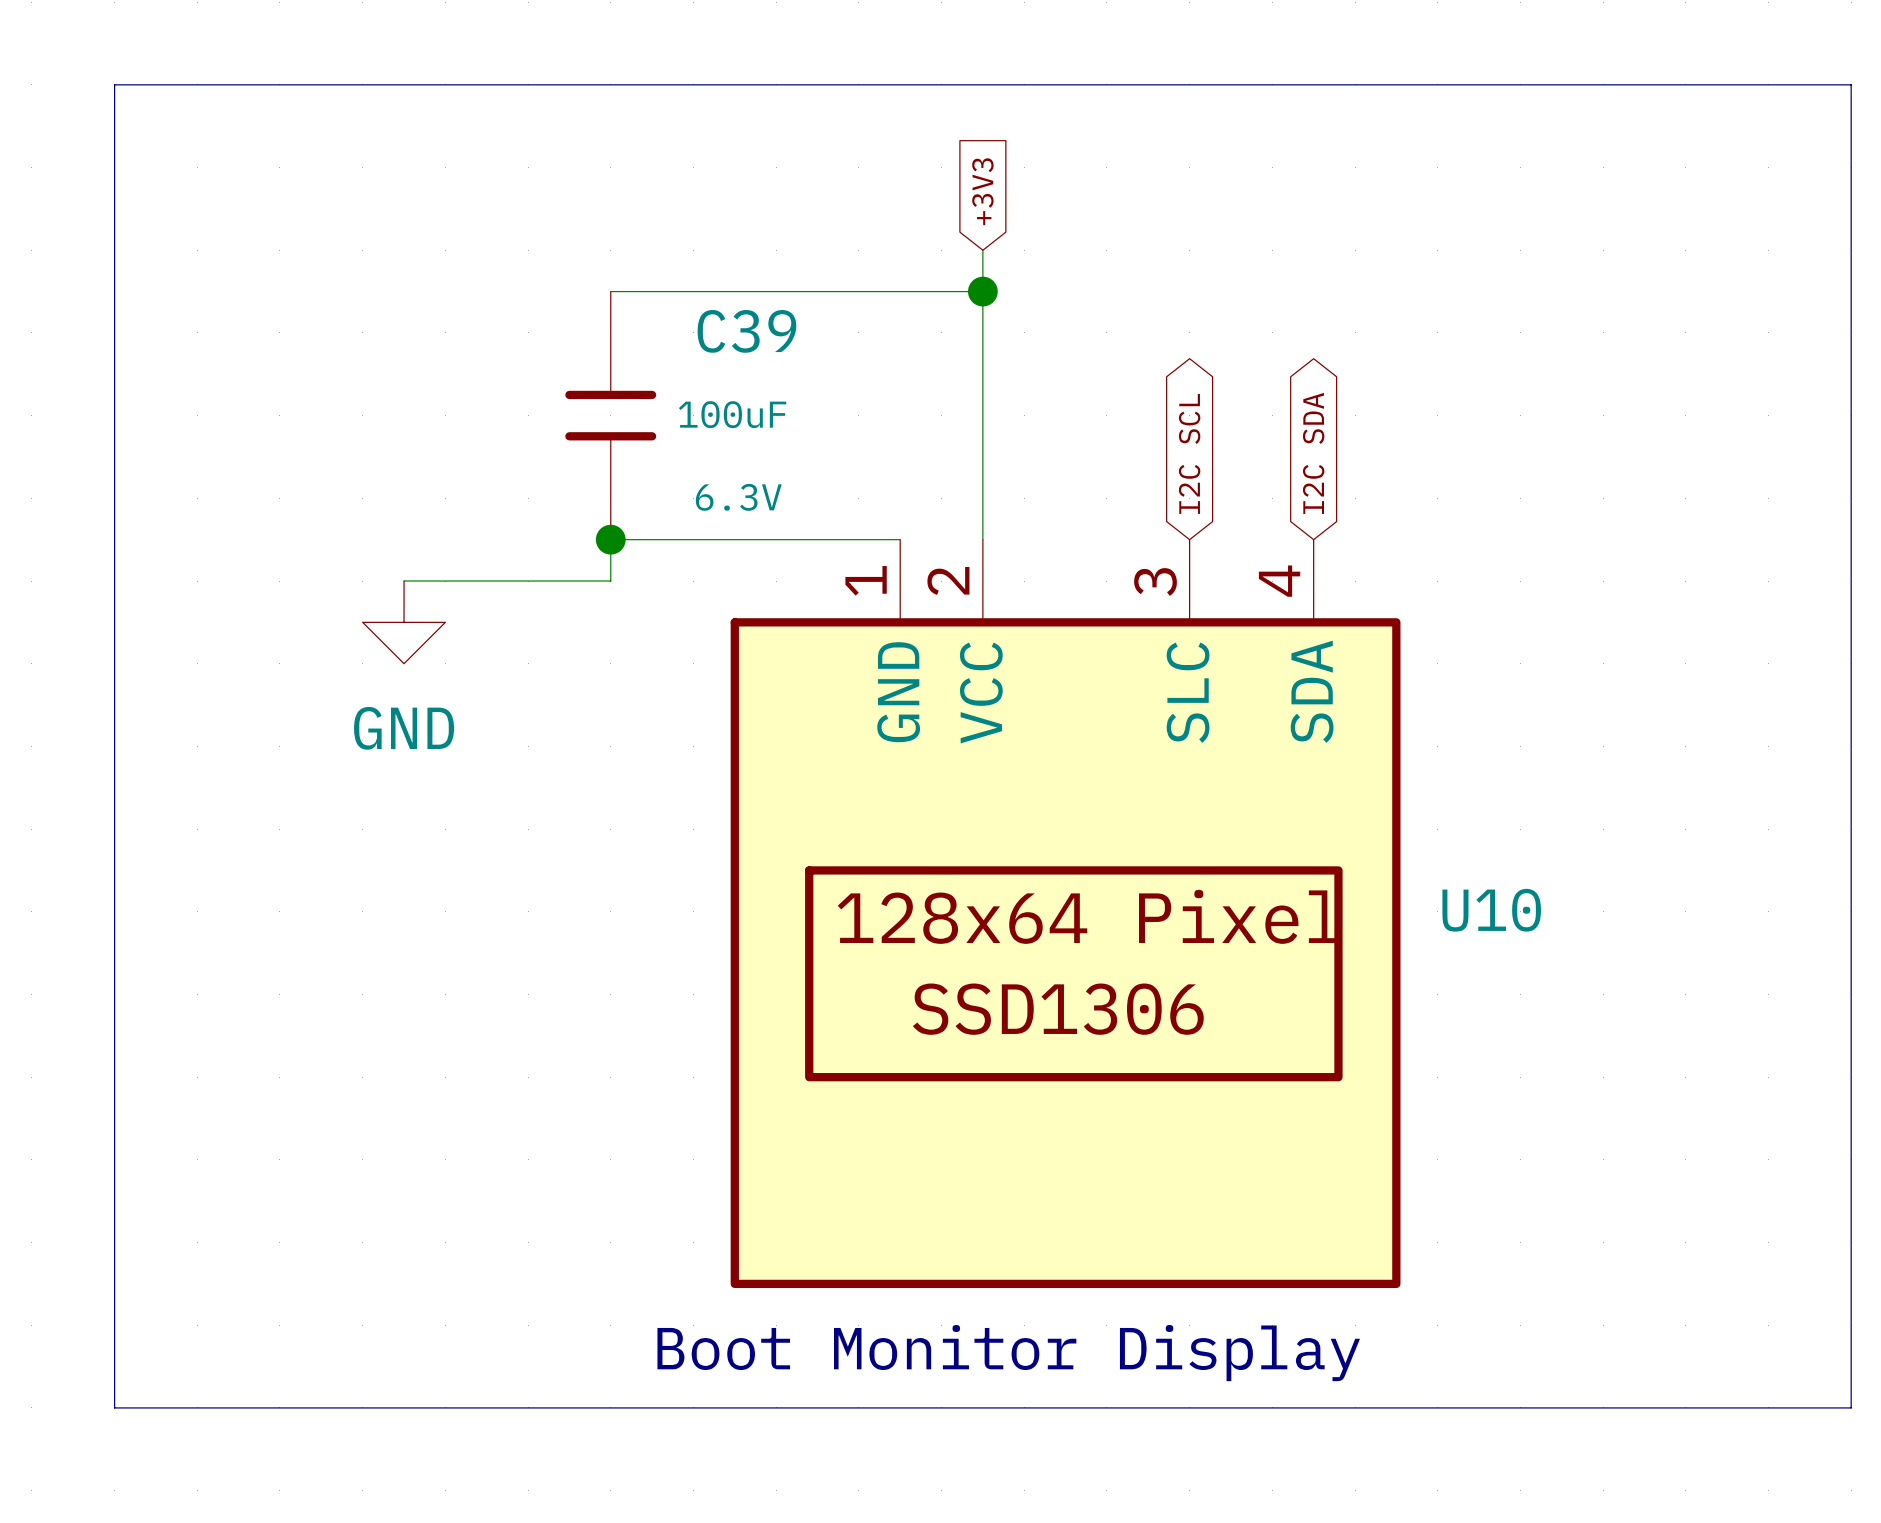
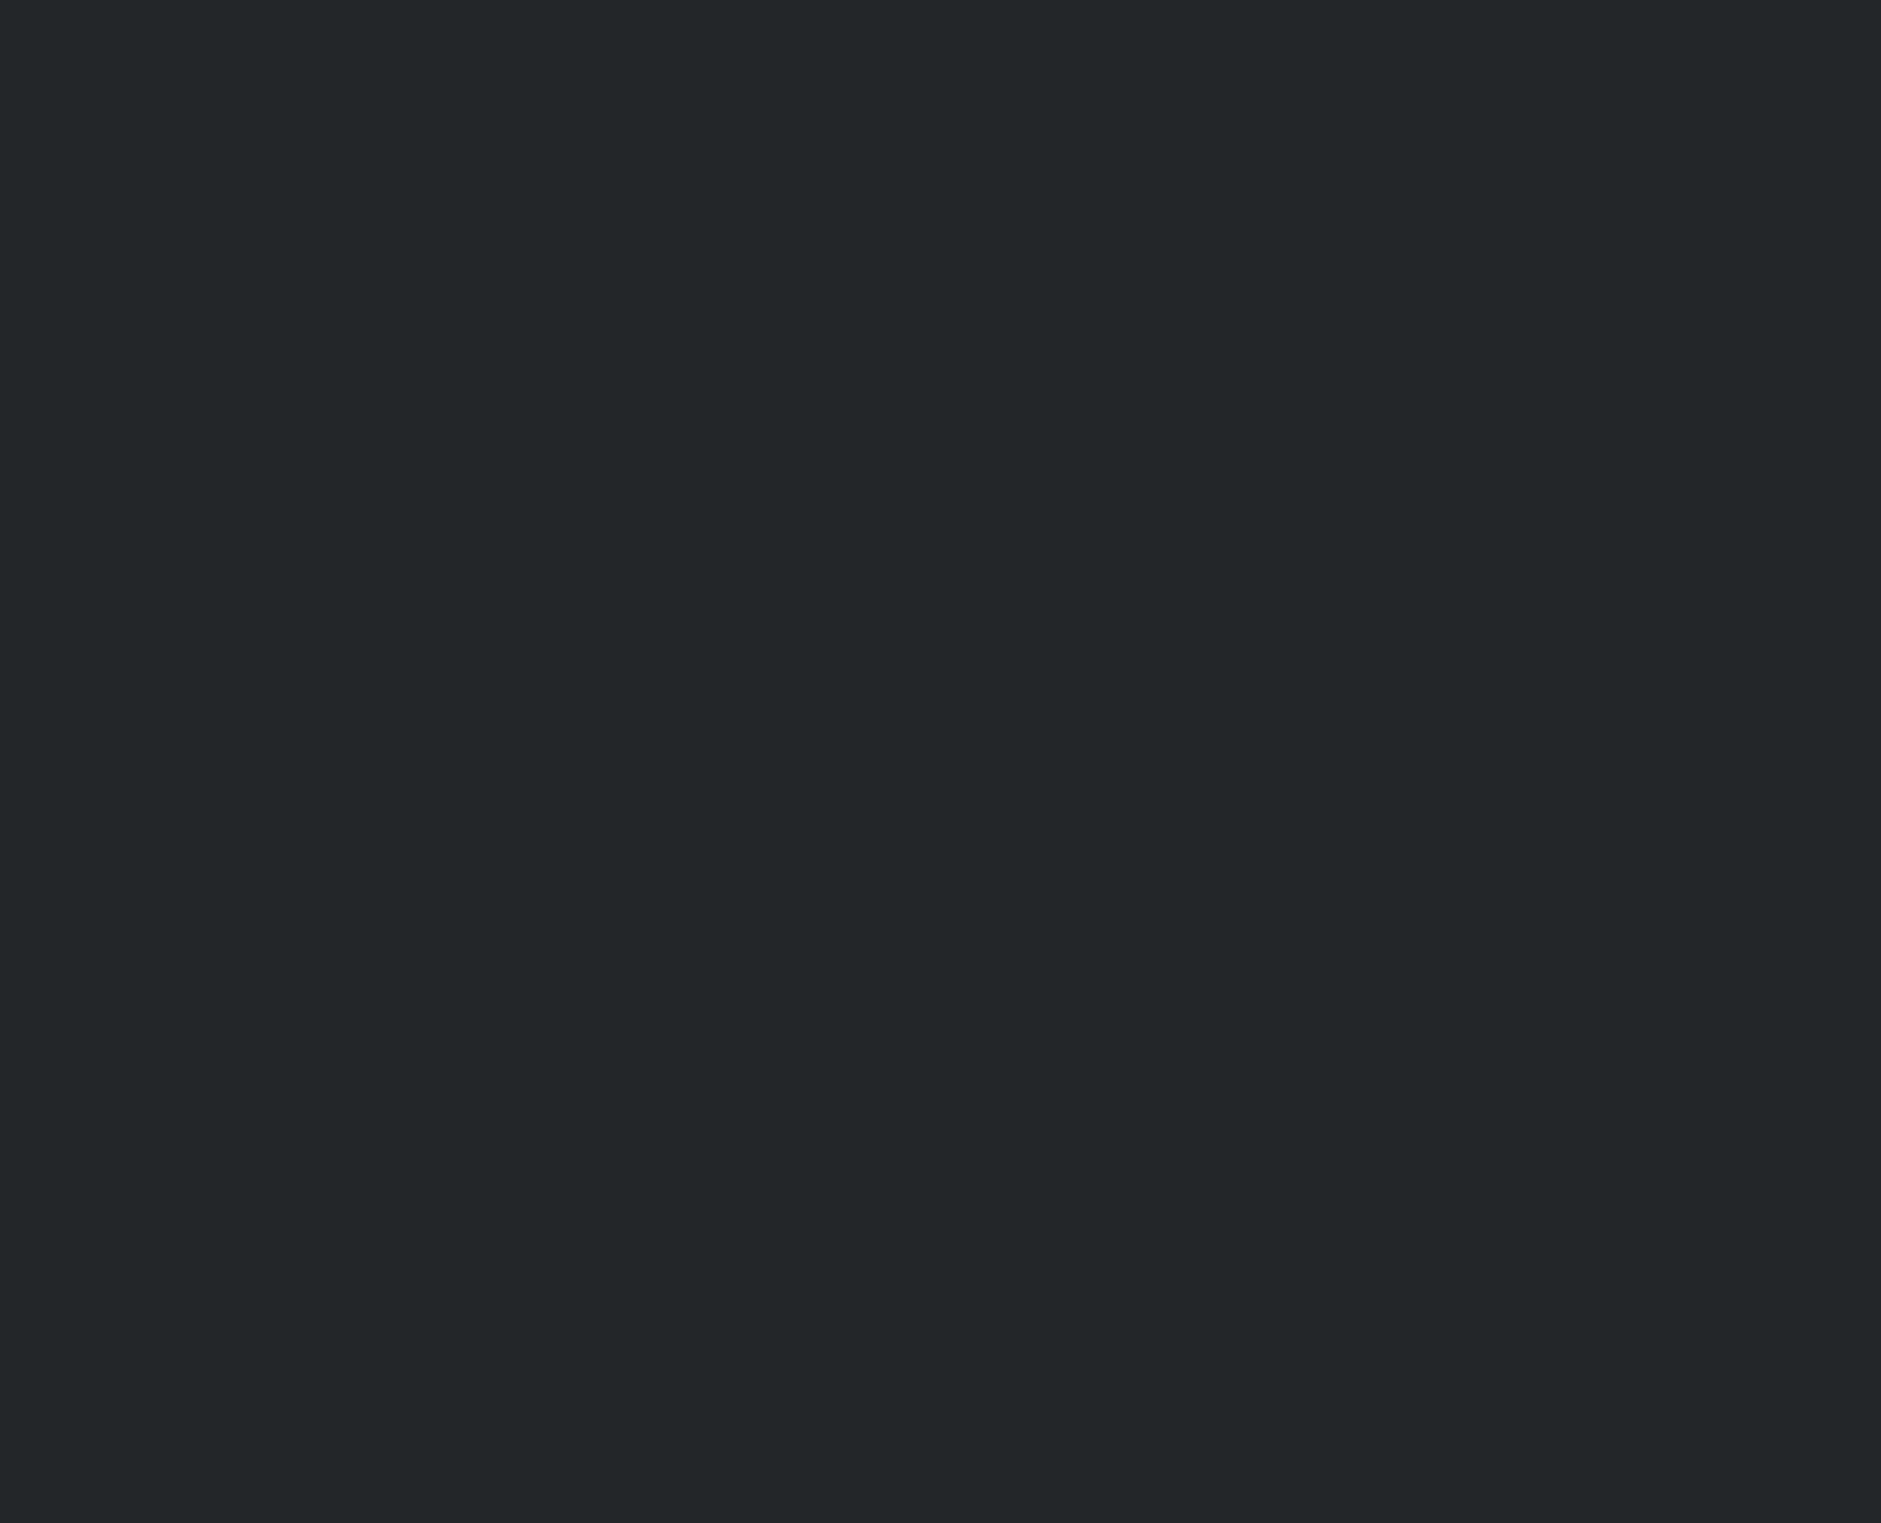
line: (114, 84) (1851, 84) (1851, 1407) (114, 1407) (114, 84) -> none
global label: +3V3 (982, 191) -> none
wire: (982, 250) (982, 539) -> none
wire: (610, 291) (982, 291) -> none
junction: (982, 291) -> none
C39: 100uF (610, 415) -> none
global label: I2C SCL (1189, 453) -> none
global label: I2C SDA (1313, 453) -> none
junction: (610, 539) -> none
wire: (900, 539) (610, 539) (610, 581) (404, 581) -> none
power symbol: GND (404, 622) -> none
U10: (1065, 913) -> none
text: Boot Monitor Display (1008, 1353) -> none

